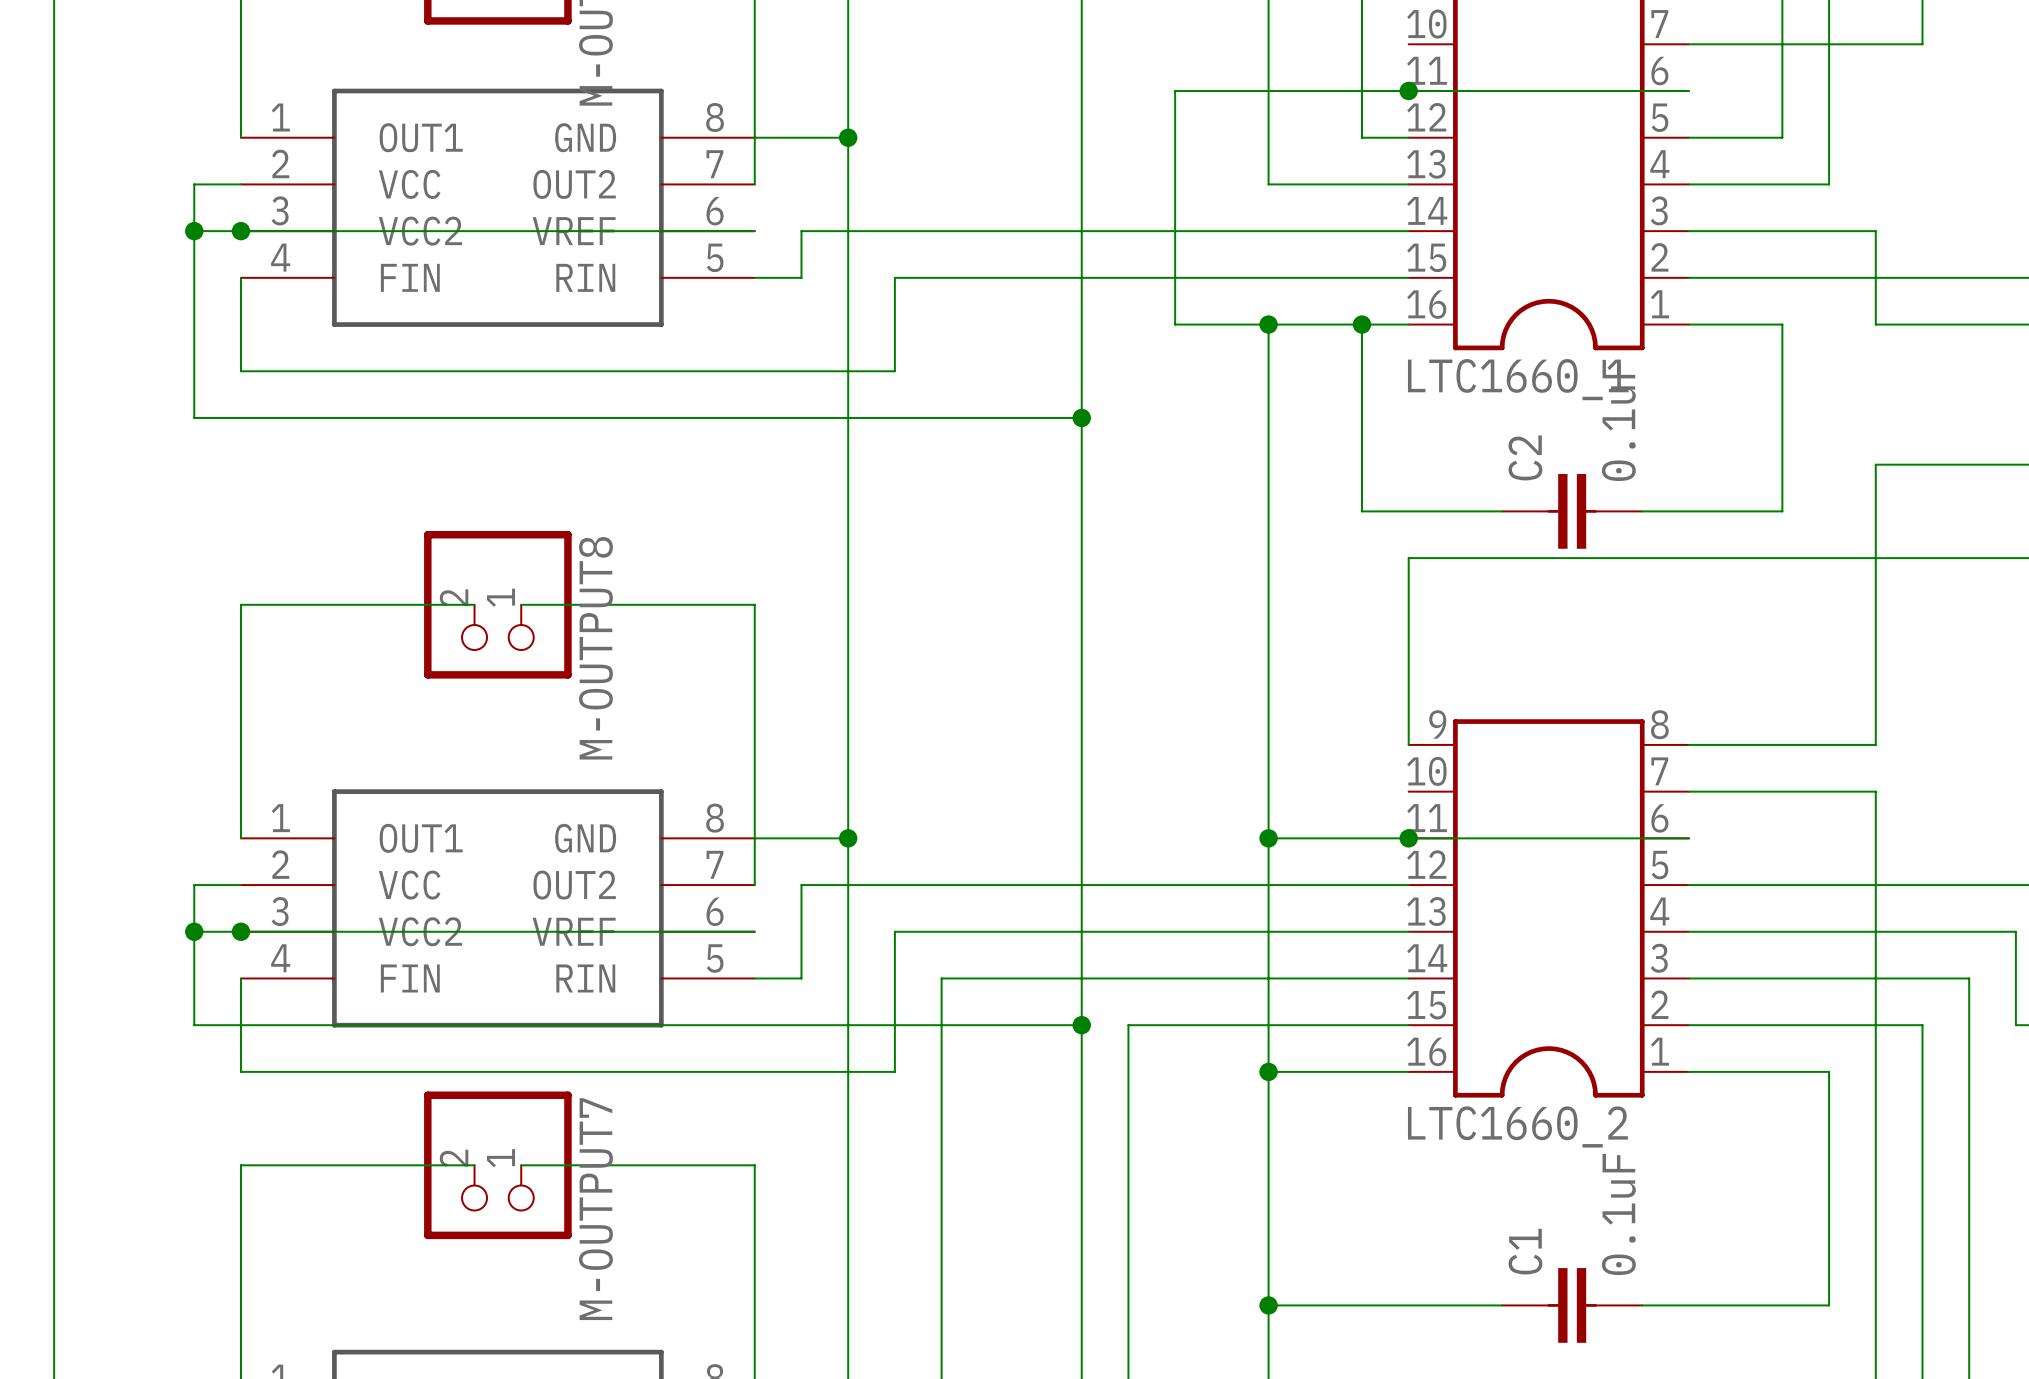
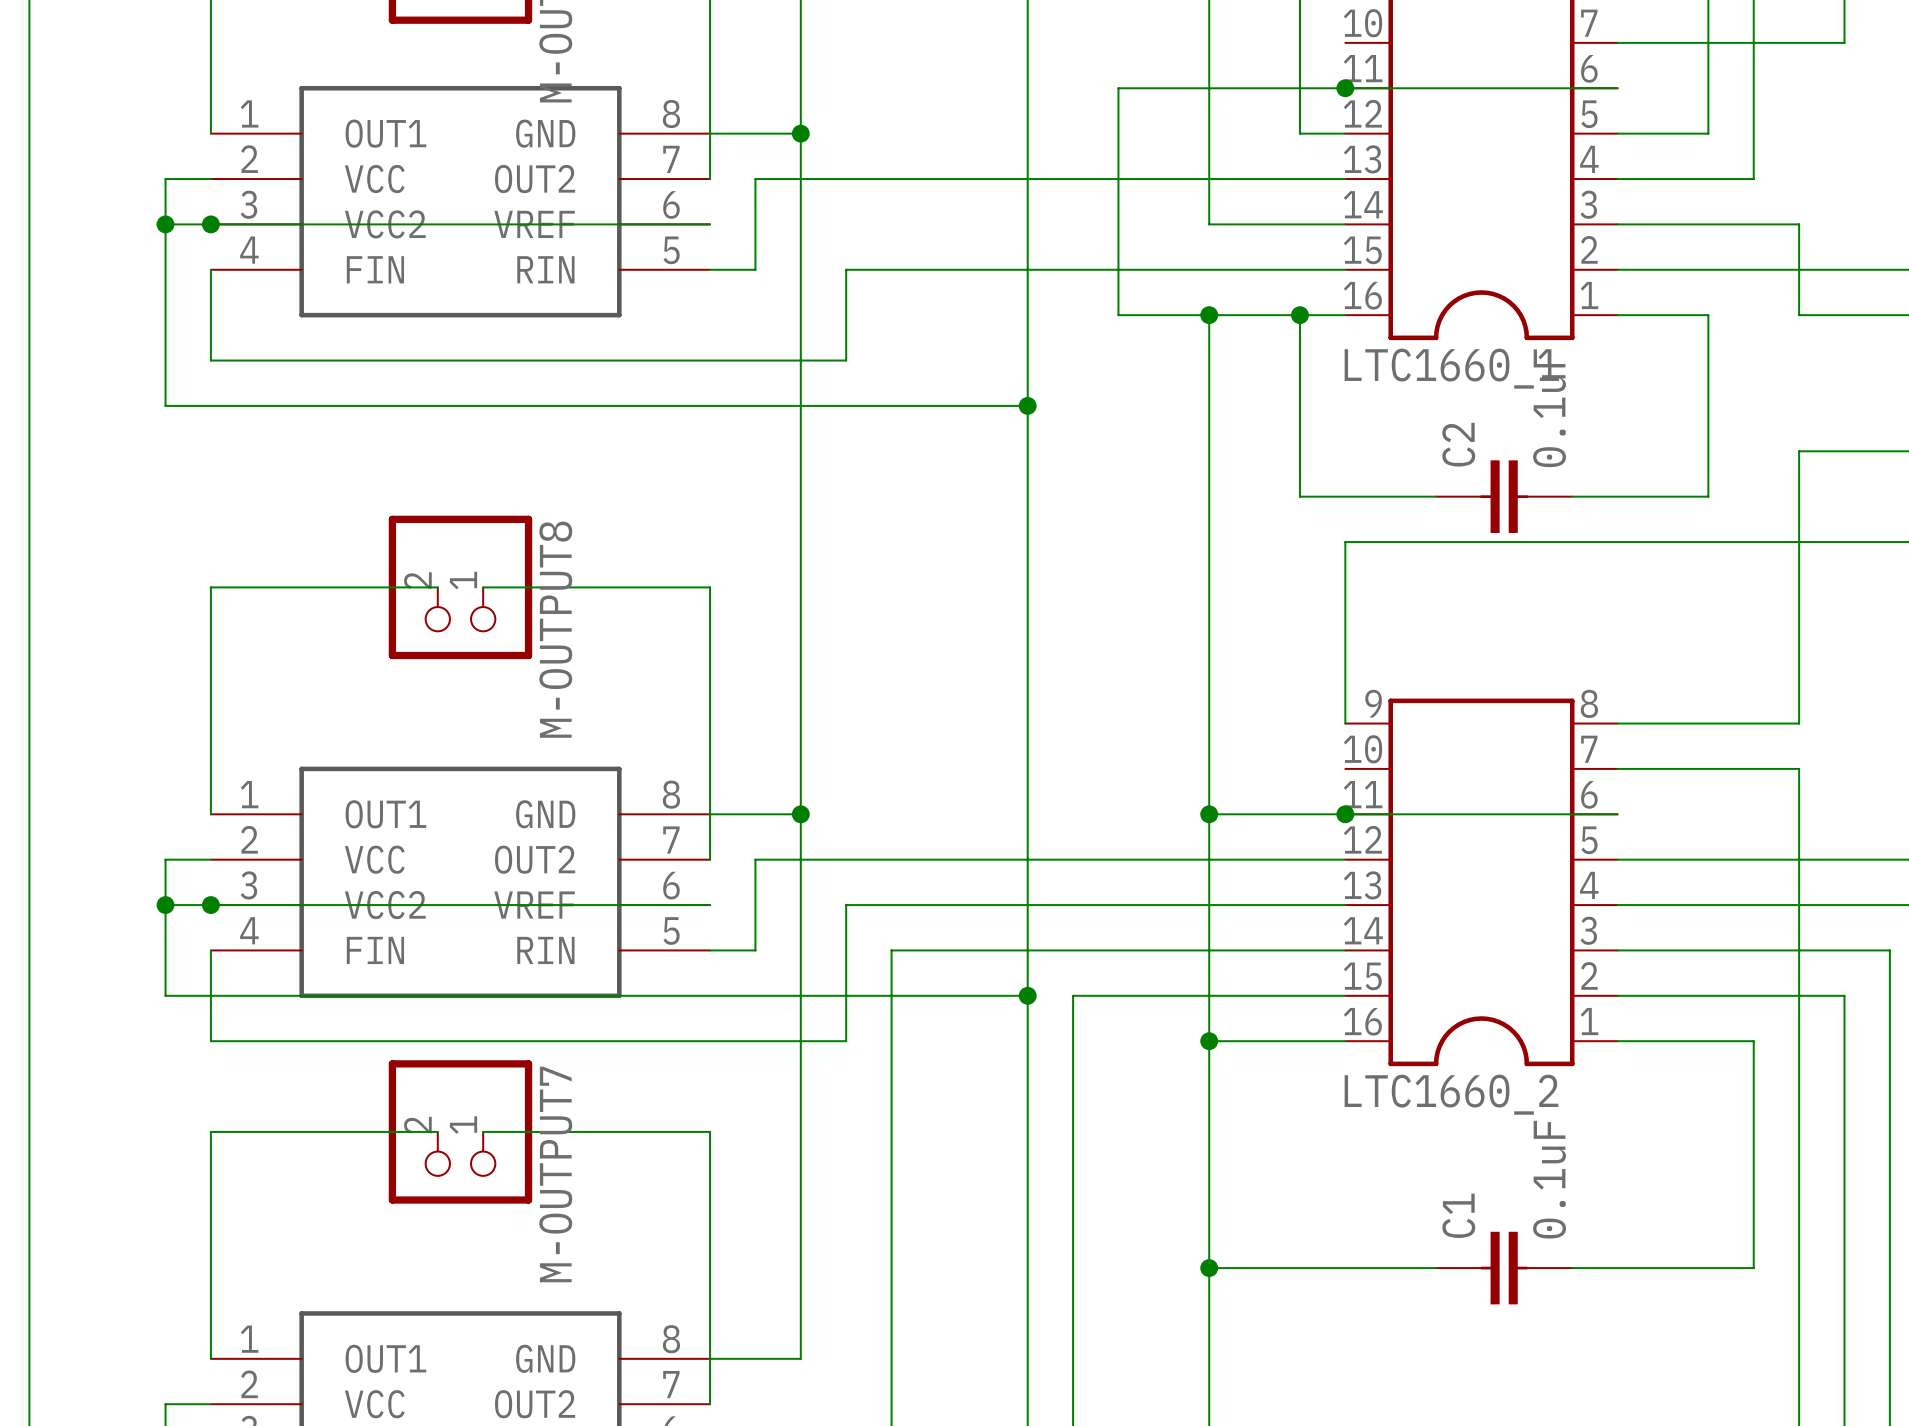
wire: (801, 231) (1268, 231) -> (755, 224) (755, 179) (1209, 179) (1209, 224)

